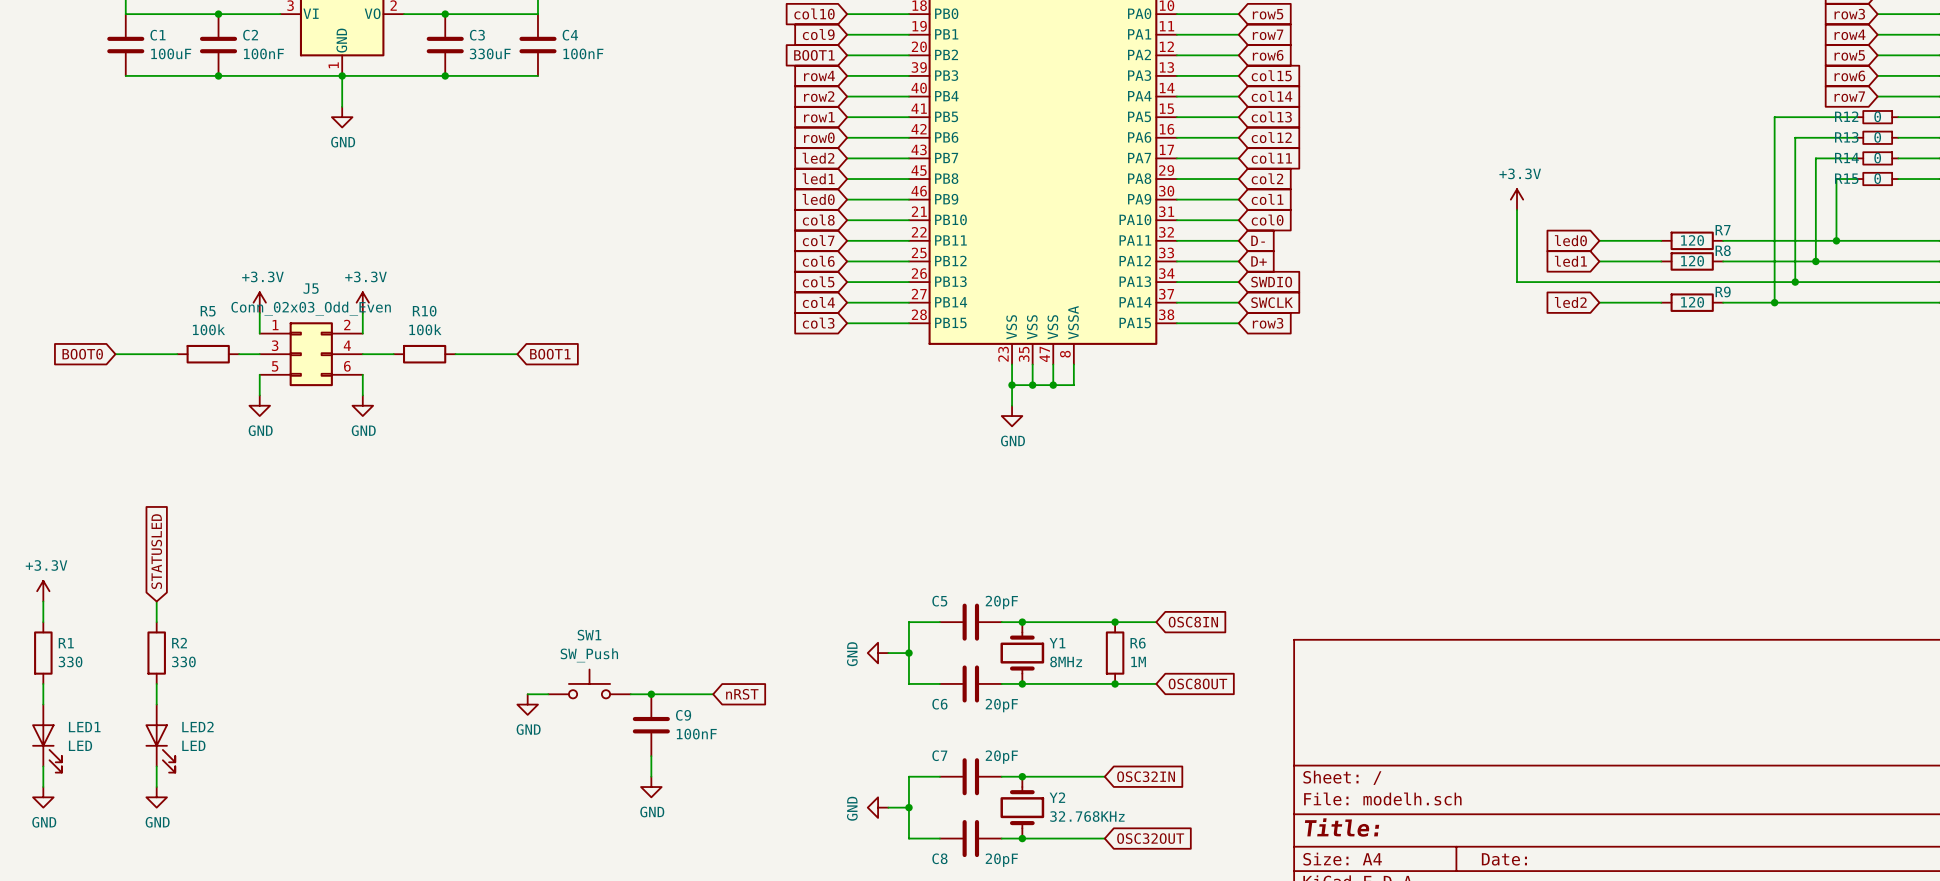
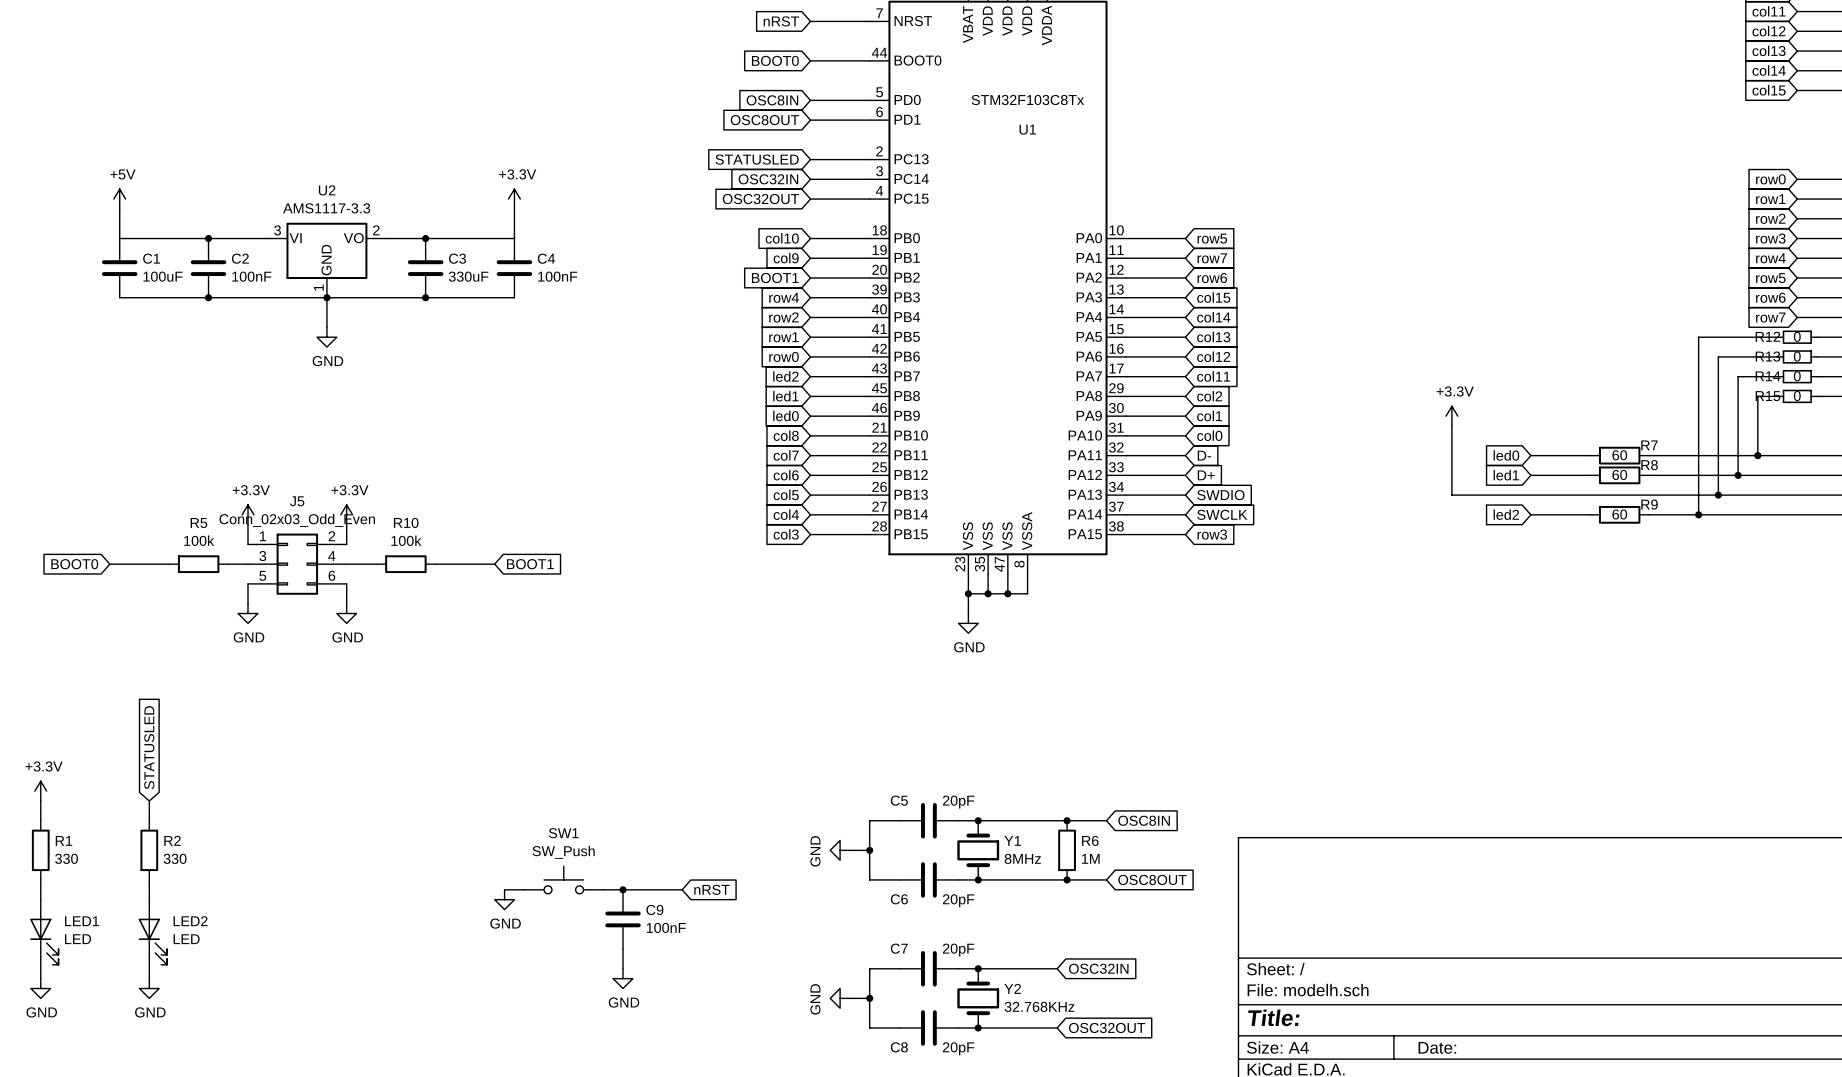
R7 value: 120 (1692, 240) -> 60 (1619, 455)
R8 value: 120 (1692, 261) -> 60 (1619, 474)
R9 value: 120 (1692, 302) -> 60 (1619, 514)

